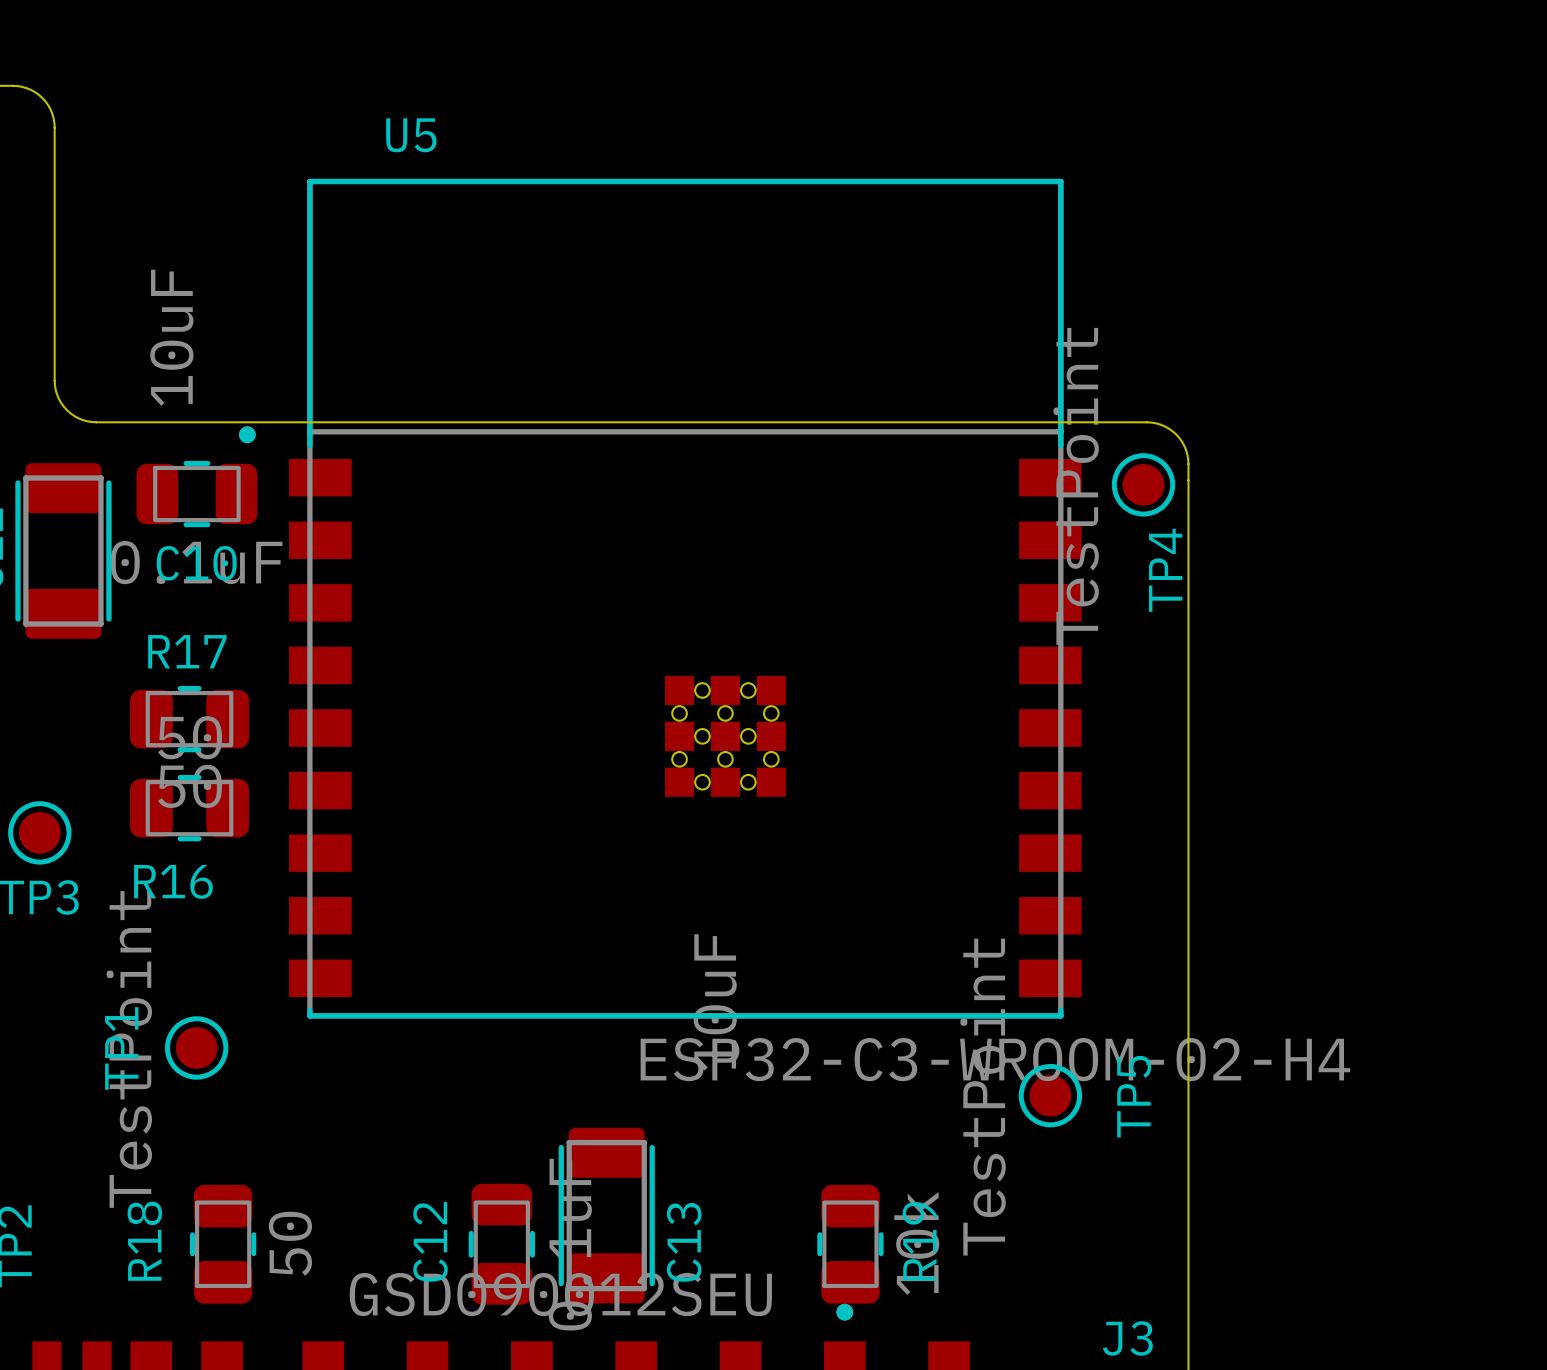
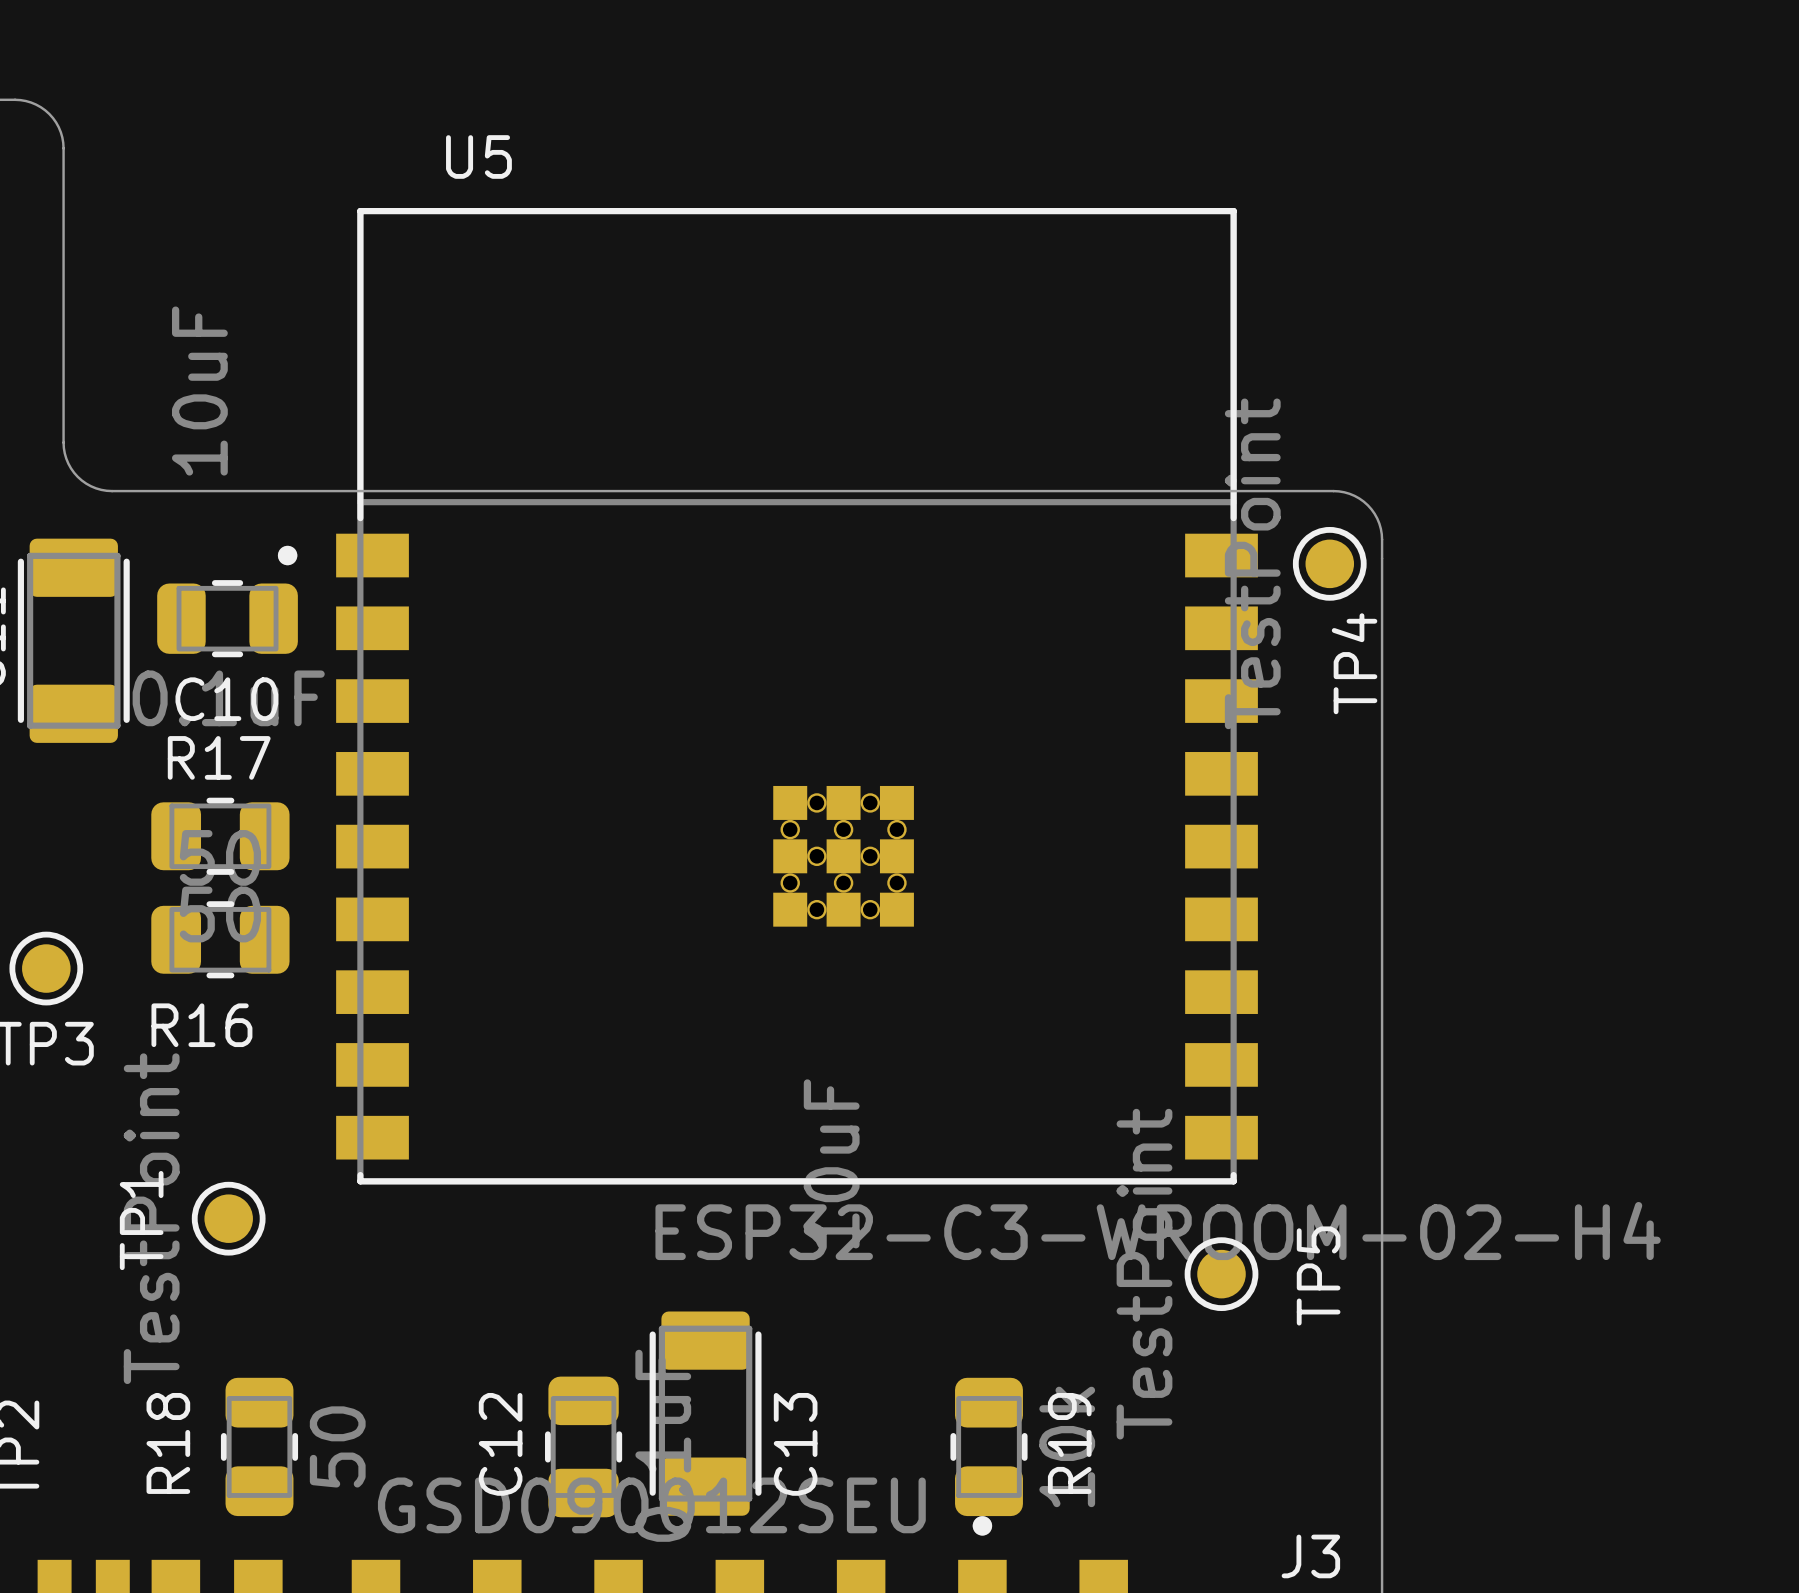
U5 footprint: [238, 178, 1082, 1019] -> [277, 208, 1258, 1185]
C10 position: (196, 494) -> (227, 618)

